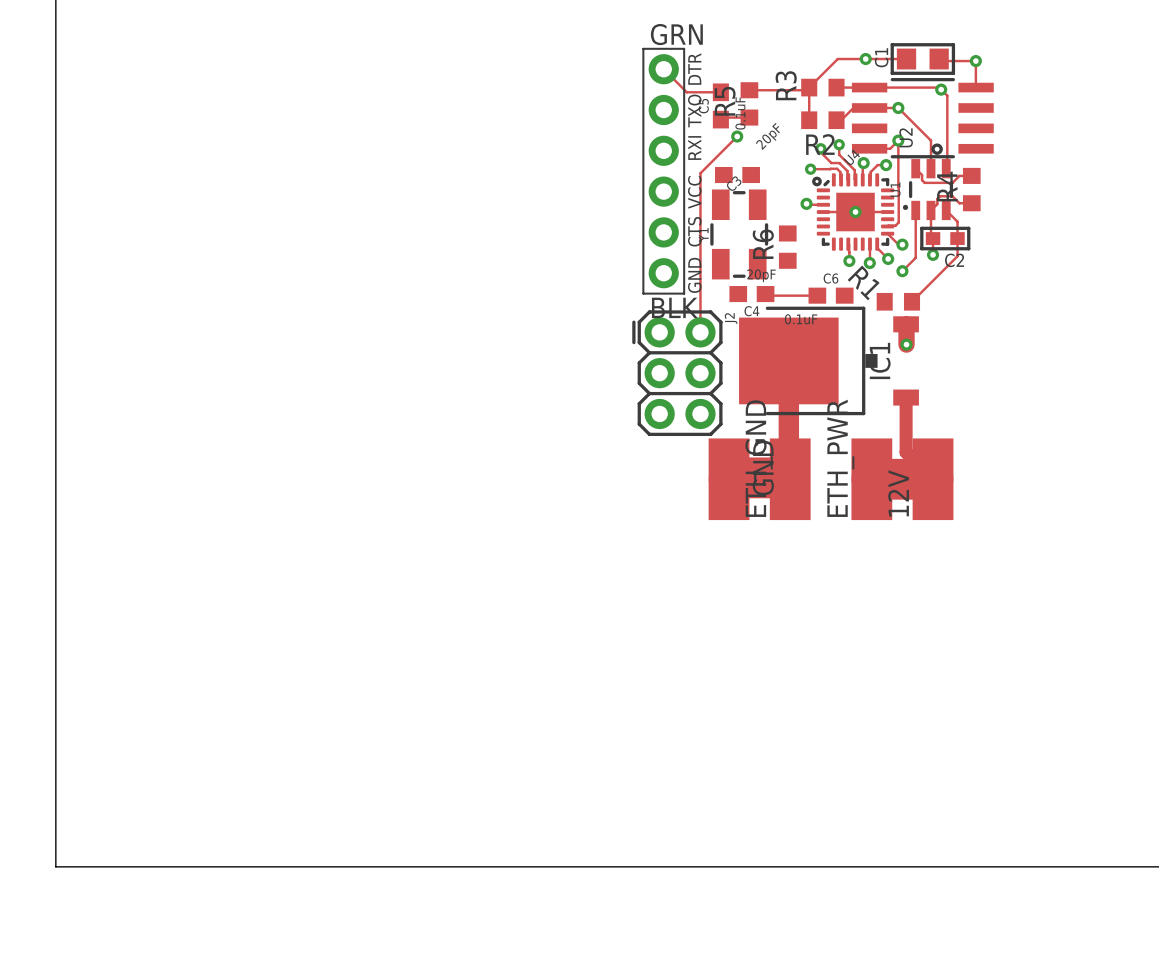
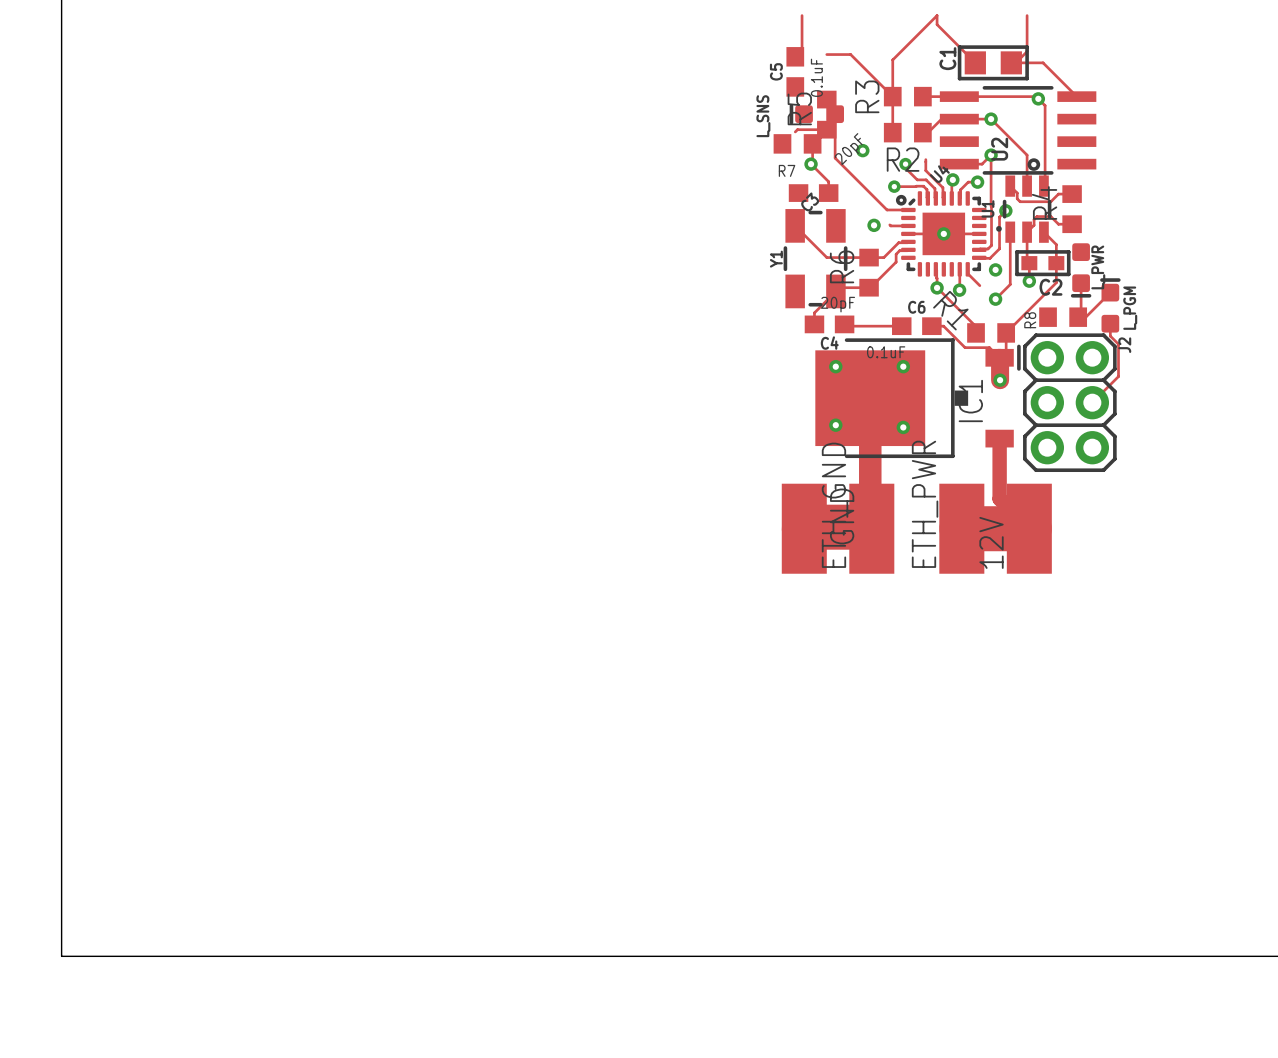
track: none -> (802, 15) (802, 50) (795, 56)
track: none -> (826, 54) (850, 54) (892, 96) (892, 59) (937, 15) (937, 24) (975, 62)
via: (865, 59) -> none
track: (906, 59) (837, 59) (806, 90) (749, 90) -> none
C1 position: (922, 59) -> (993, 62)
track: (939, 59) (941, 61) (975, 61) (975, 87) -> (1027, 15) (1027, 51) (1013, 65) (1011, 62) (1043, 62) (1076, 96)
via: (975, 61) -> none
track: (663, 69) (686, 92) (720, 92) -> none
L_SNS: none -> (816, 114)
track: none -> (835, 114) (835, 158) (887, 209) (908, 209)
C5 position: (720, 105) -> (795, 71)
R7: none -> (797, 143)
track: none -> (812, 143) (811, 164) (828, 181) (828, 193) (824, 193)
track: (737, 136) (700, 173) (700, 332) -> none
via position: (737, 136) -> (811, 164)
via: none -> (862, 150)
via: (839, 144) -> none
part: (663, 171) -> none
via: none -> (1005, 210)
via position: (806, 203) -> (874, 225)
track: none -> (795, 225) (826, 257) (883, 257) (898, 242) (908, 241)
track: none -> (908, 249) (899, 250) (896, 254) (896, 262) (870, 287) (839, 287) (814, 312) (814, 324)
track: (887, 233) (898, 244) (902, 244) -> (979, 257) (990, 258) (999, 248) (999, 217) (1005, 210)
L_PWR: none -> (1081, 270)
track: none -> (1081, 283) (1081, 314) (1078, 317) (1085, 317) (1110, 292)
via: (888, 258) -> none
track: none -> (937, 287) (974, 324) (976, 332)
L_PGM: none -> (1110, 305)
R8: none -> (1063, 317)
track: none -> (1110, 323) (1110, 336) (1118, 344) (1118, 376) (1092, 402)
track: none -> (931, 326) (943, 326) (965, 347) (989, 347) (1000, 358) (1006, 352) (1005, 334)
via: none -> (835, 366)
via: none -> (903, 366)
J2 position: (677, 373) -> (1066, 402)
via: none -> (835, 425)
via: none -> (903, 427)

